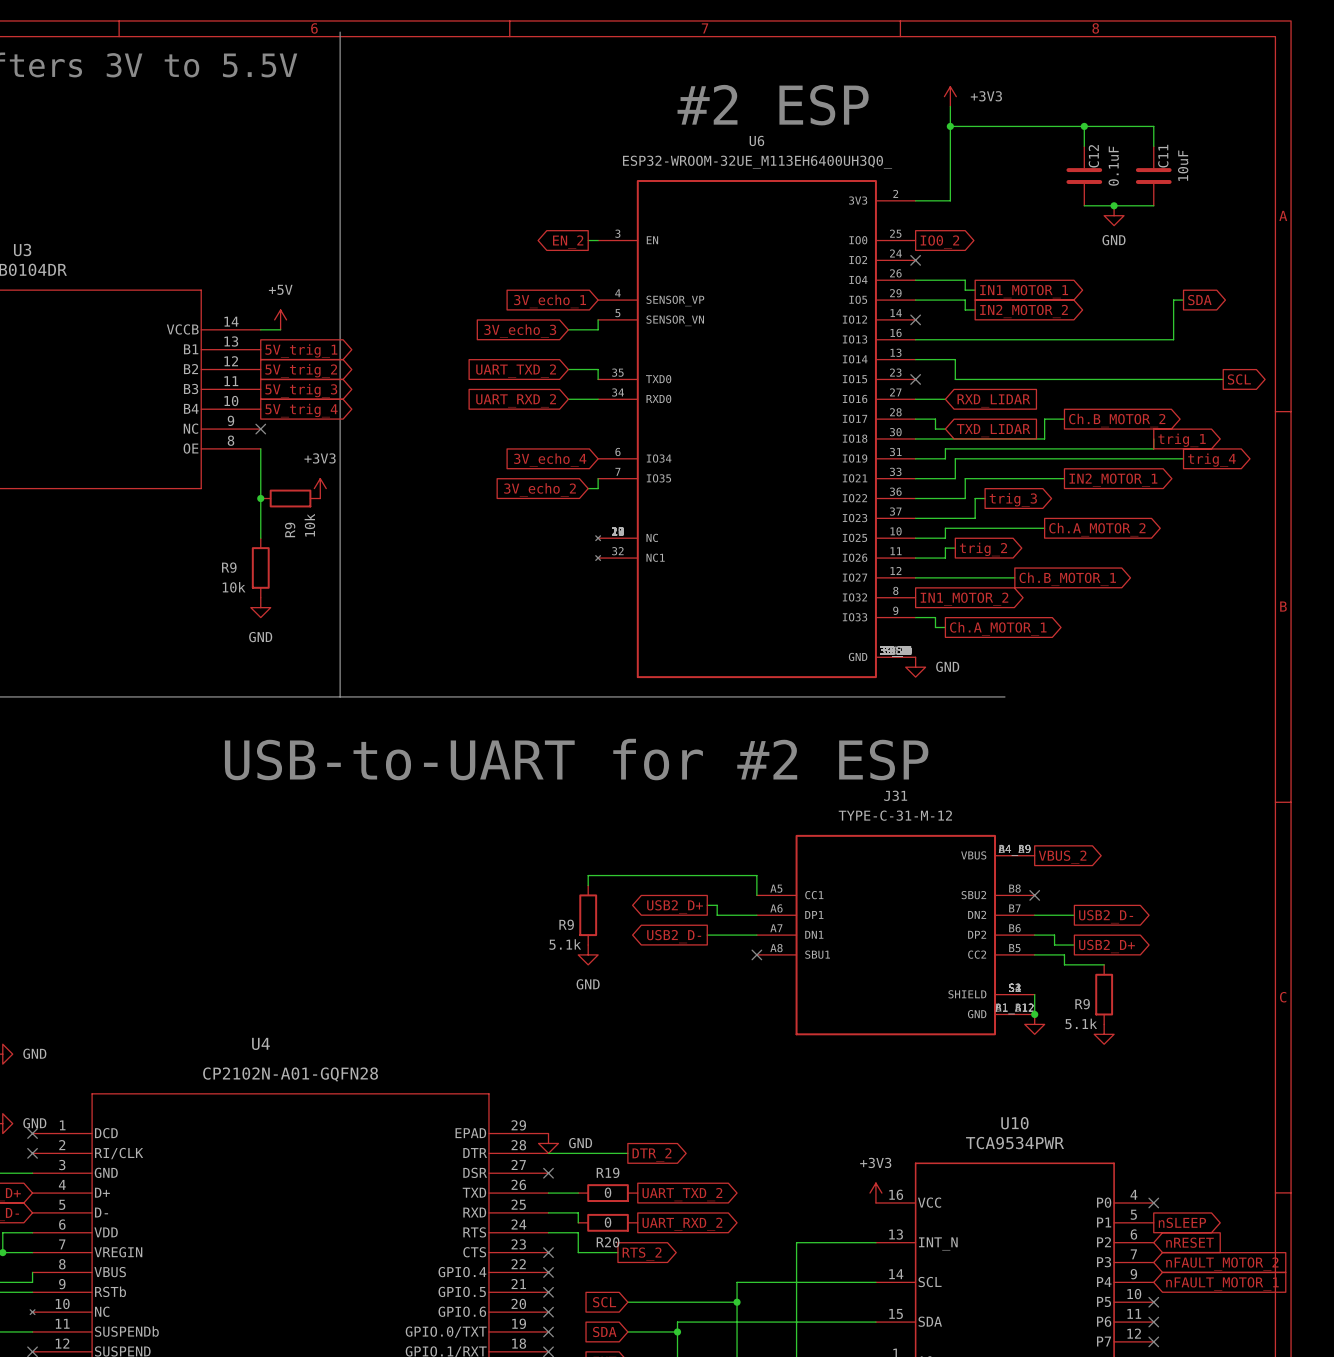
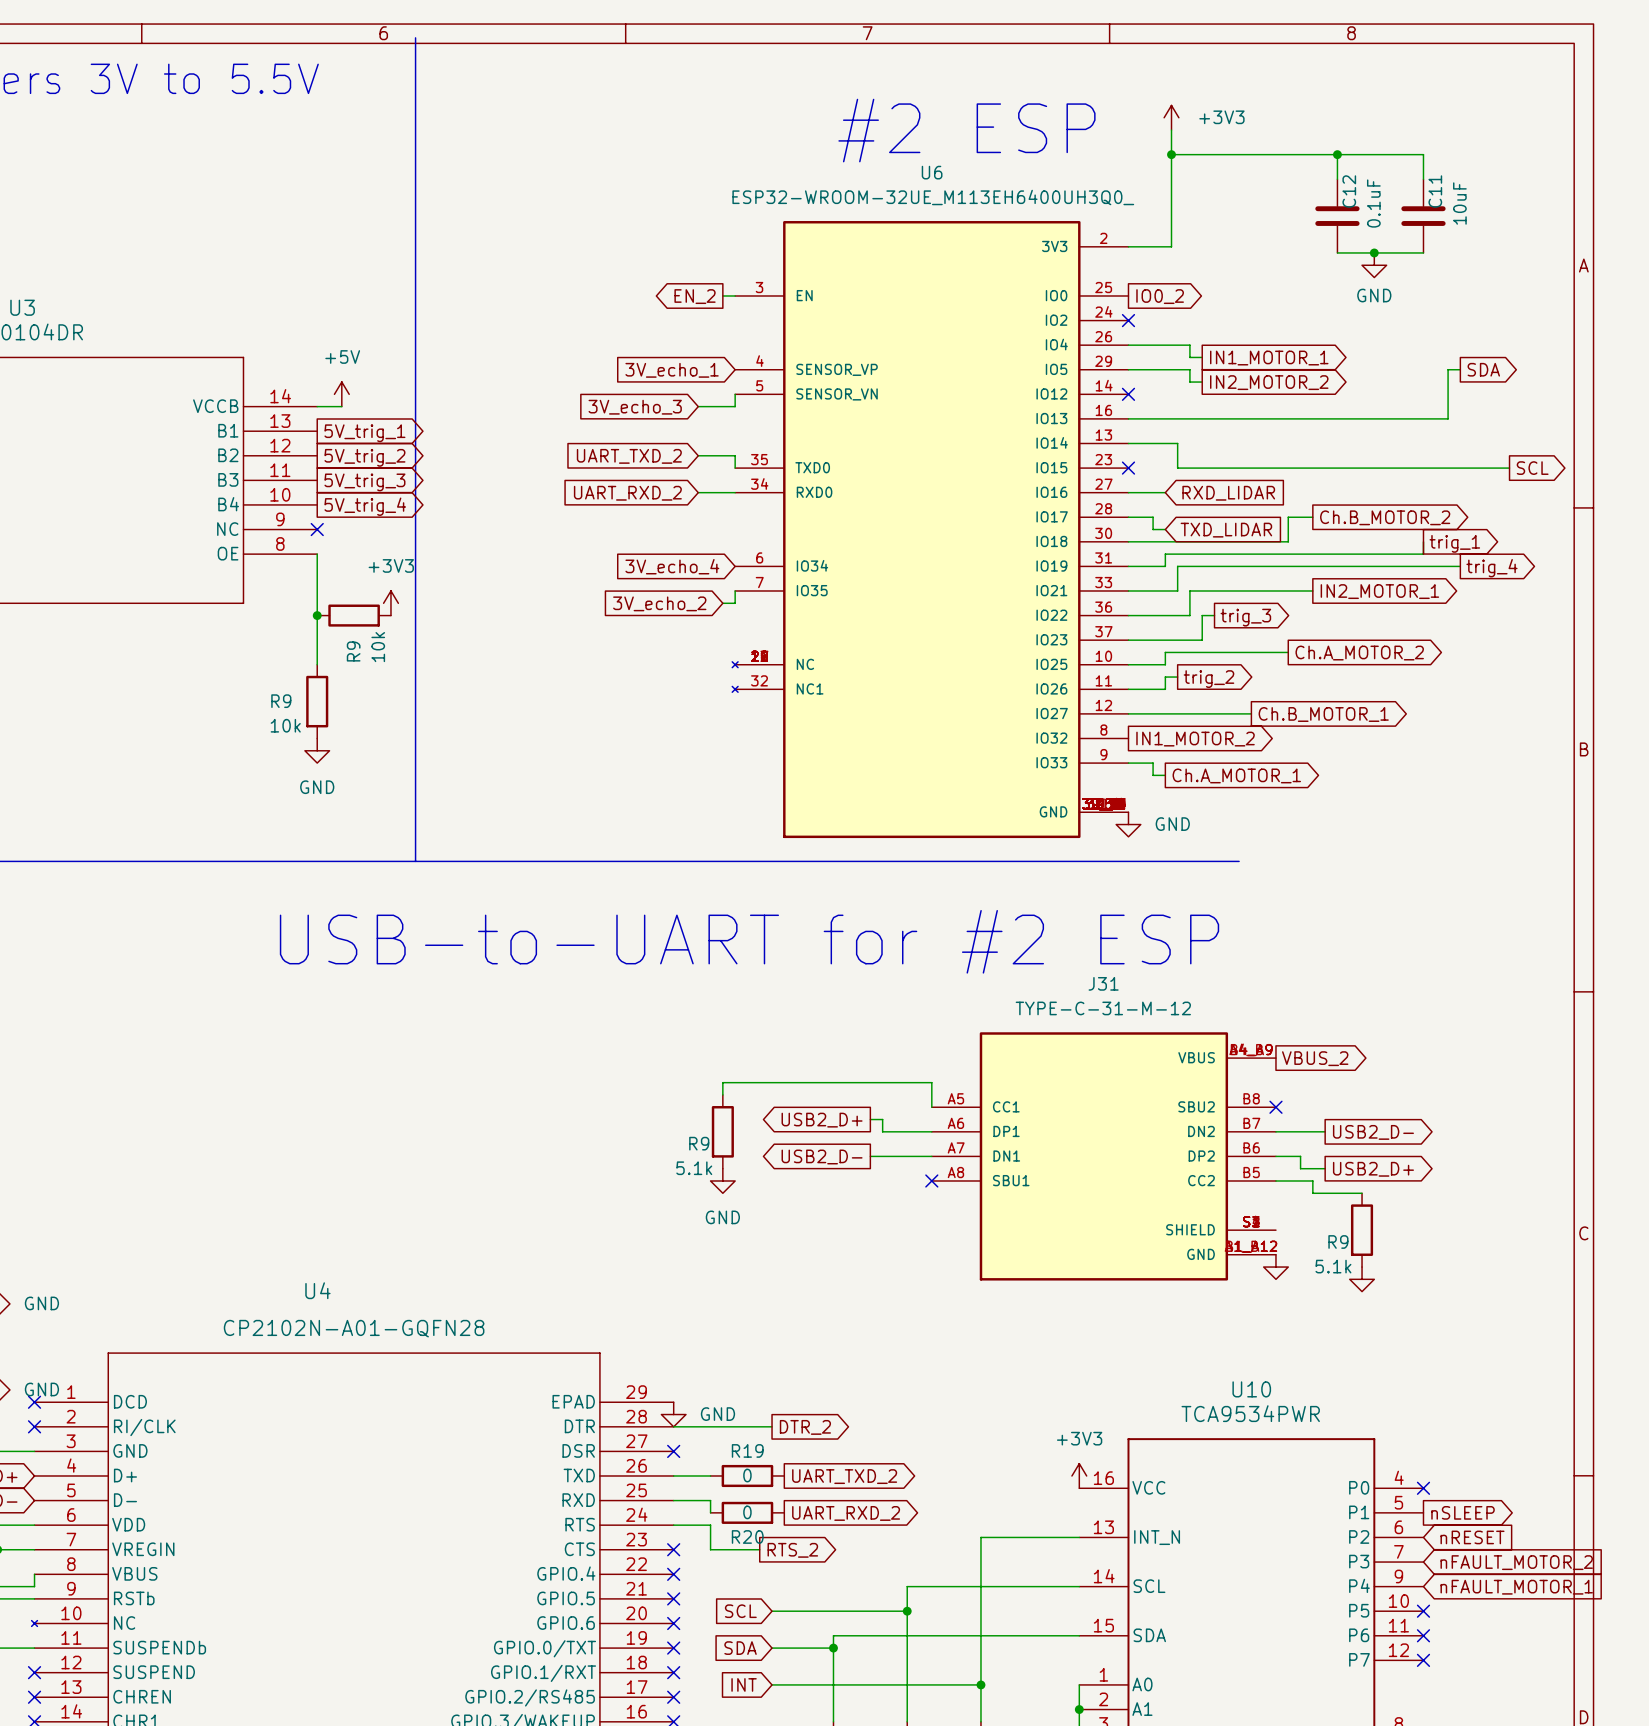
wire: (1034, 994) (1034, 1014) -> none
junction: (1034, 1014) -> none

